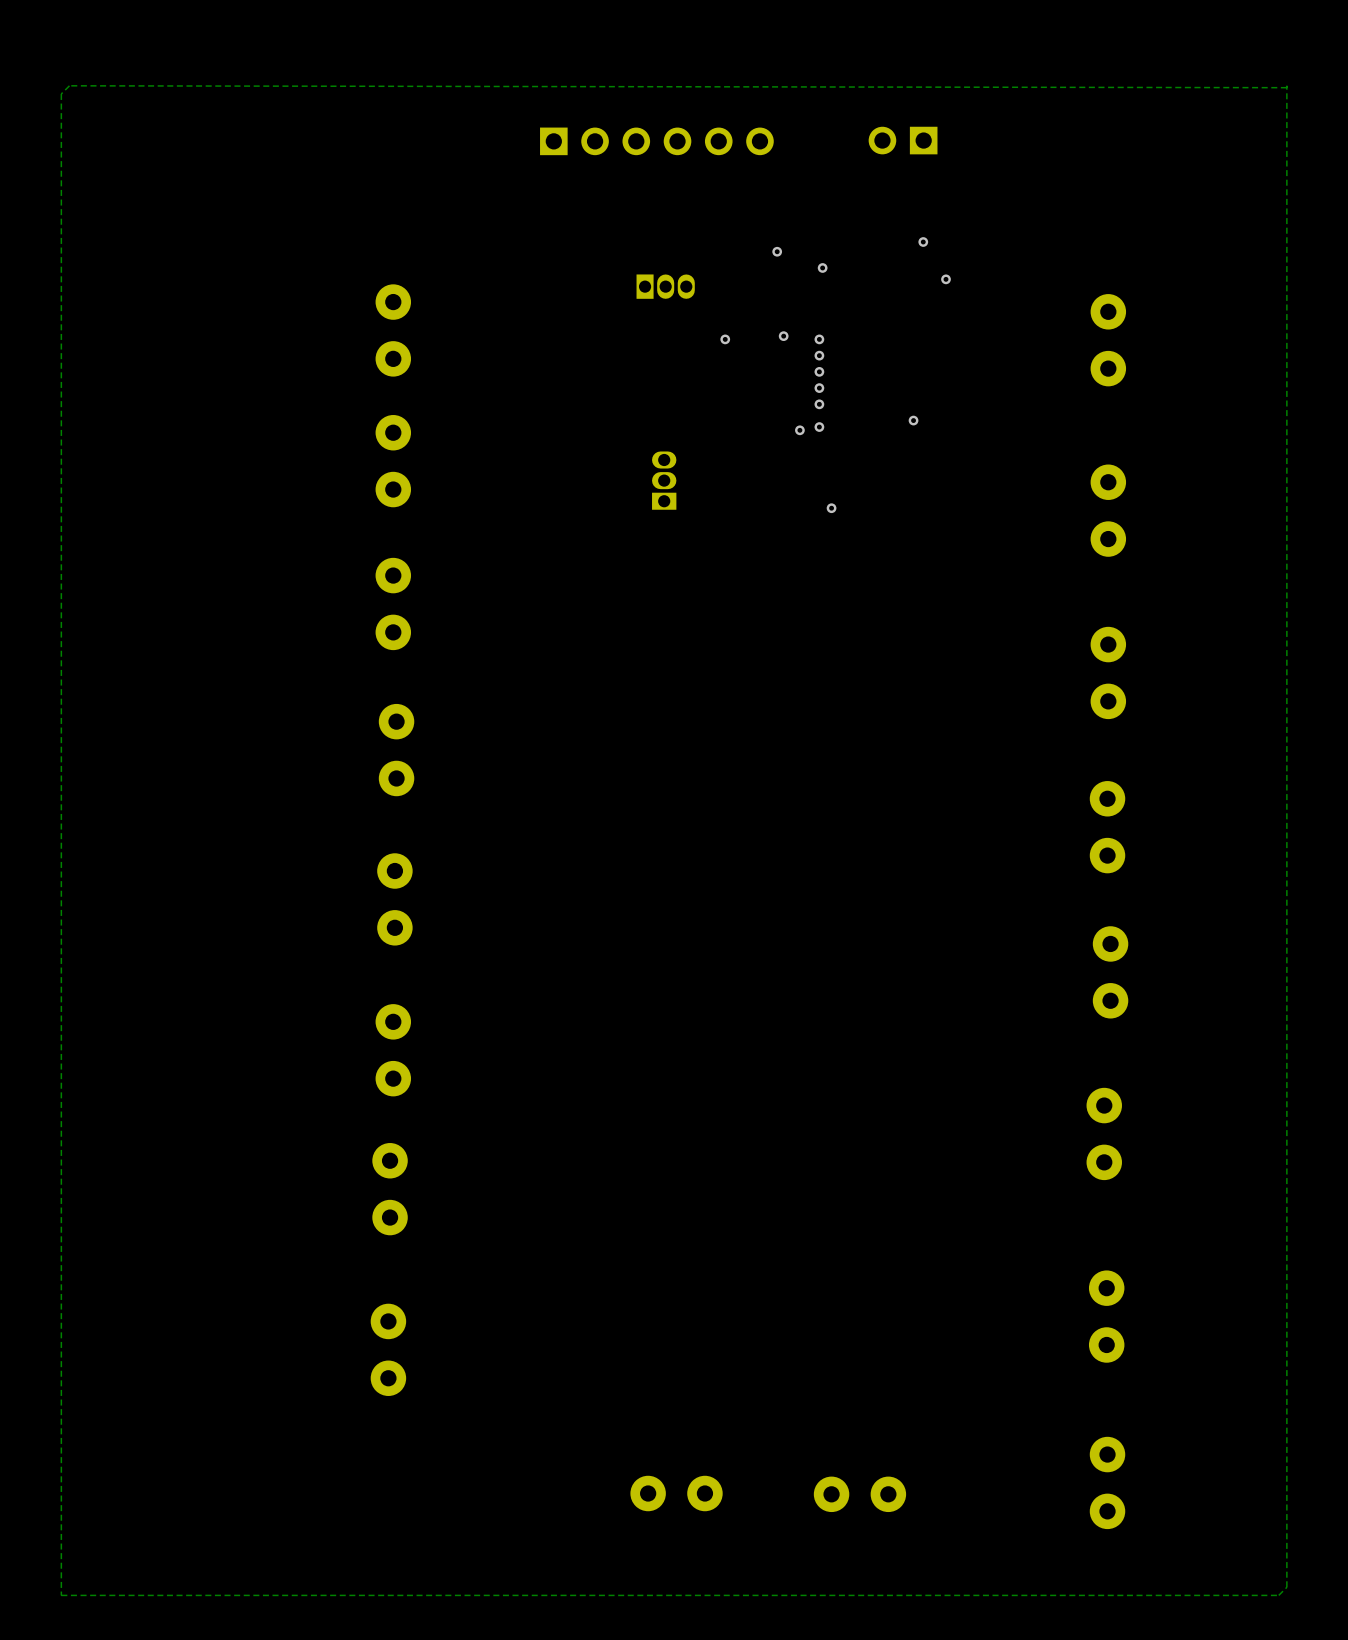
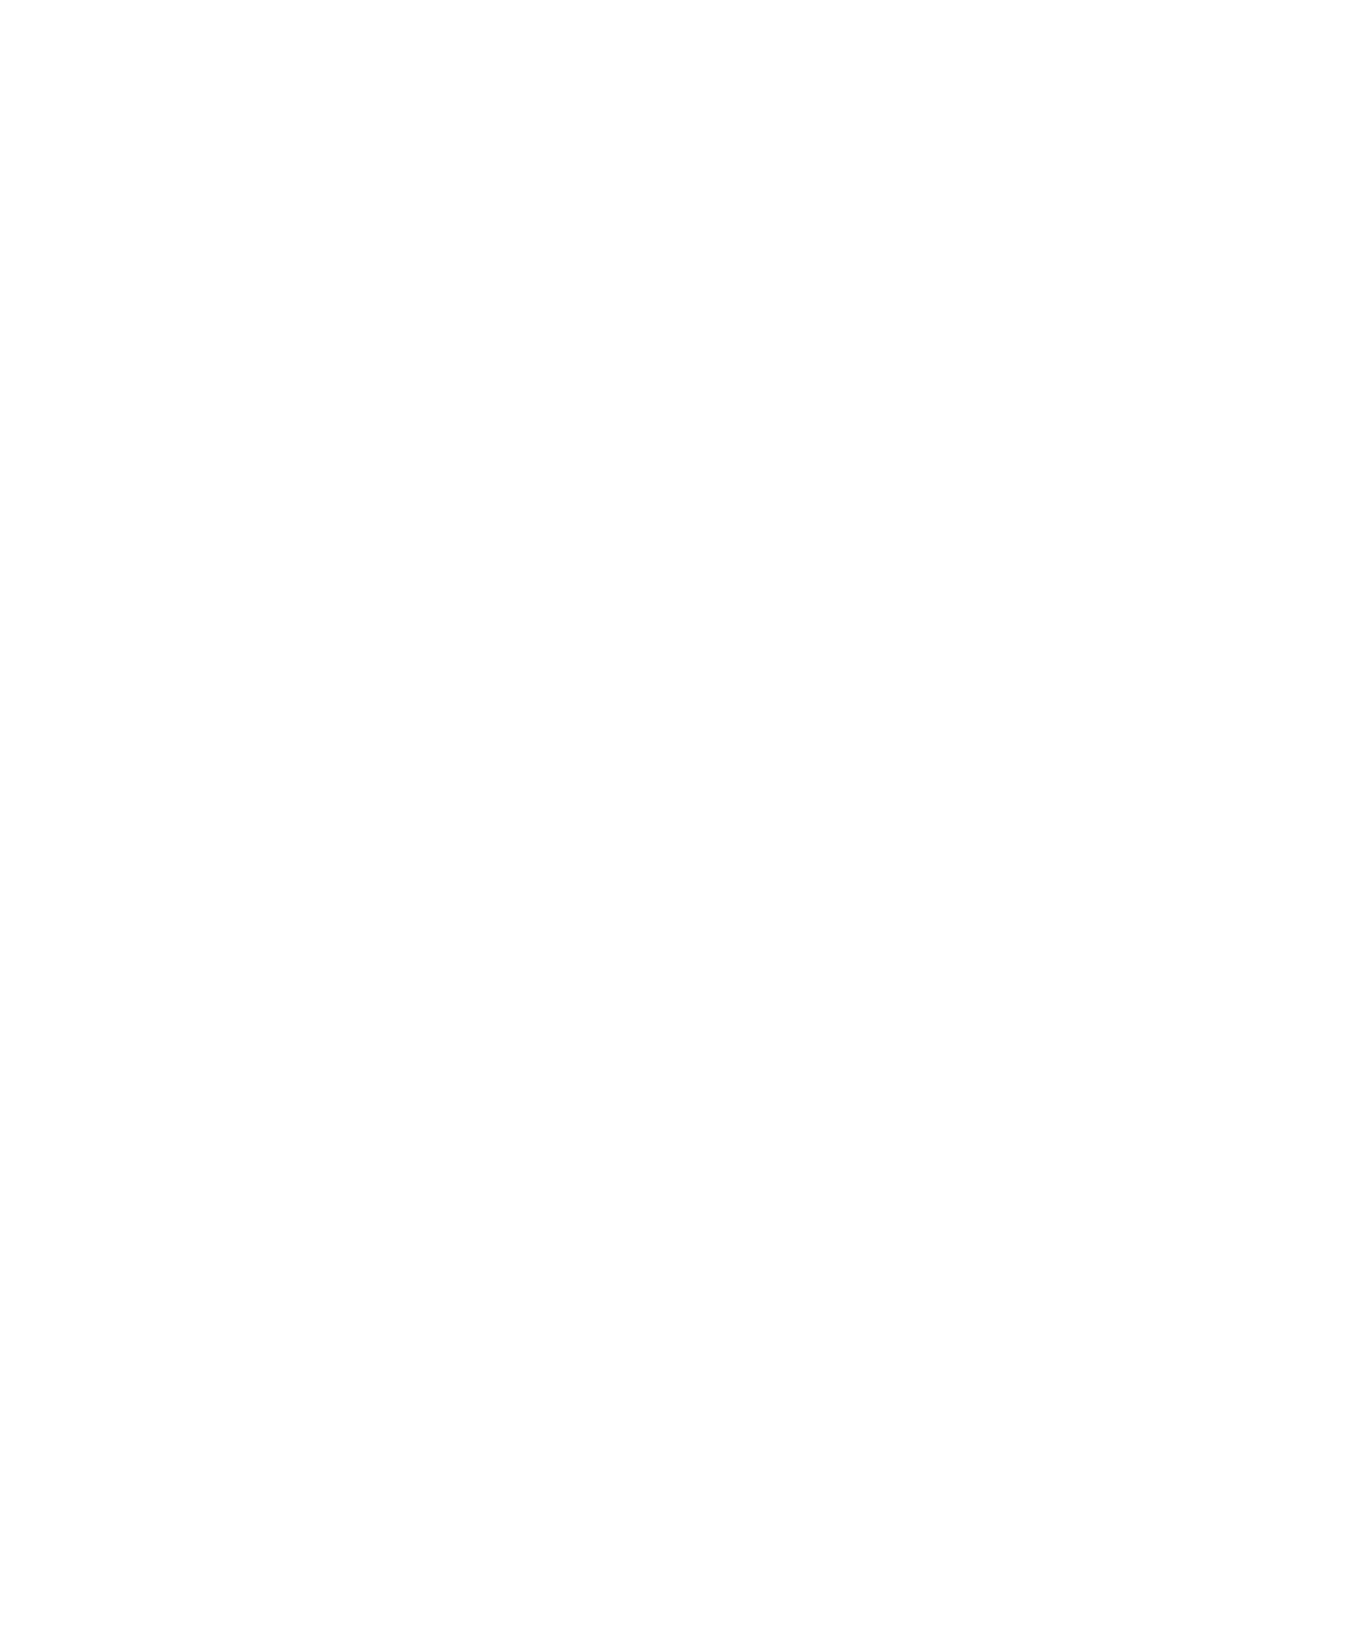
zone outline: (1286, 85) (1286, 1587) (1278, 1595) (61, 1595) (61, 93) (69, 85) (1286, 87) -> none
part: (903, 140) -> none
part: (656, 141) -> none
via: (923, 242) -> none
via: (777, 251) -> none
via: (822, 267) -> none
via: (946, 279) -> none
part: (665, 286) -> none
part: (393, 330) -> none
via: (783, 336) -> none
via: (725, 339) -> none
via: (819, 339) -> none
part: (1108, 340) -> none
via: (819, 355) -> none
via: (819, 371) -> none
via: (819, 388) -> none
via: (819, 404) -> none
via: (913, 420) -> none
via: (819, 427) -> none
via: (799, 430) -> none
part: (393, 461) -> none
part: (664, 480) -> none
via: (831, 508) -> none
part: (1108, 510) -> none
part: (393, 603) -> none
part: (1108, 672) -> none
part: (396, 750) -> none
part: (1107, 827) -> none
part: (394, 899) -> none
part: (1110, 972) -> none
part: (393, 1050) -> none
part: (1104, 1133) -> none
part: (390, 1189) -> none
part: (1106, 1316) -> none
part: (388, 1349) -> none
part: (1107, 1482) -> none
part: (676, 1493) -> none
part: (859, 1494) -> none

